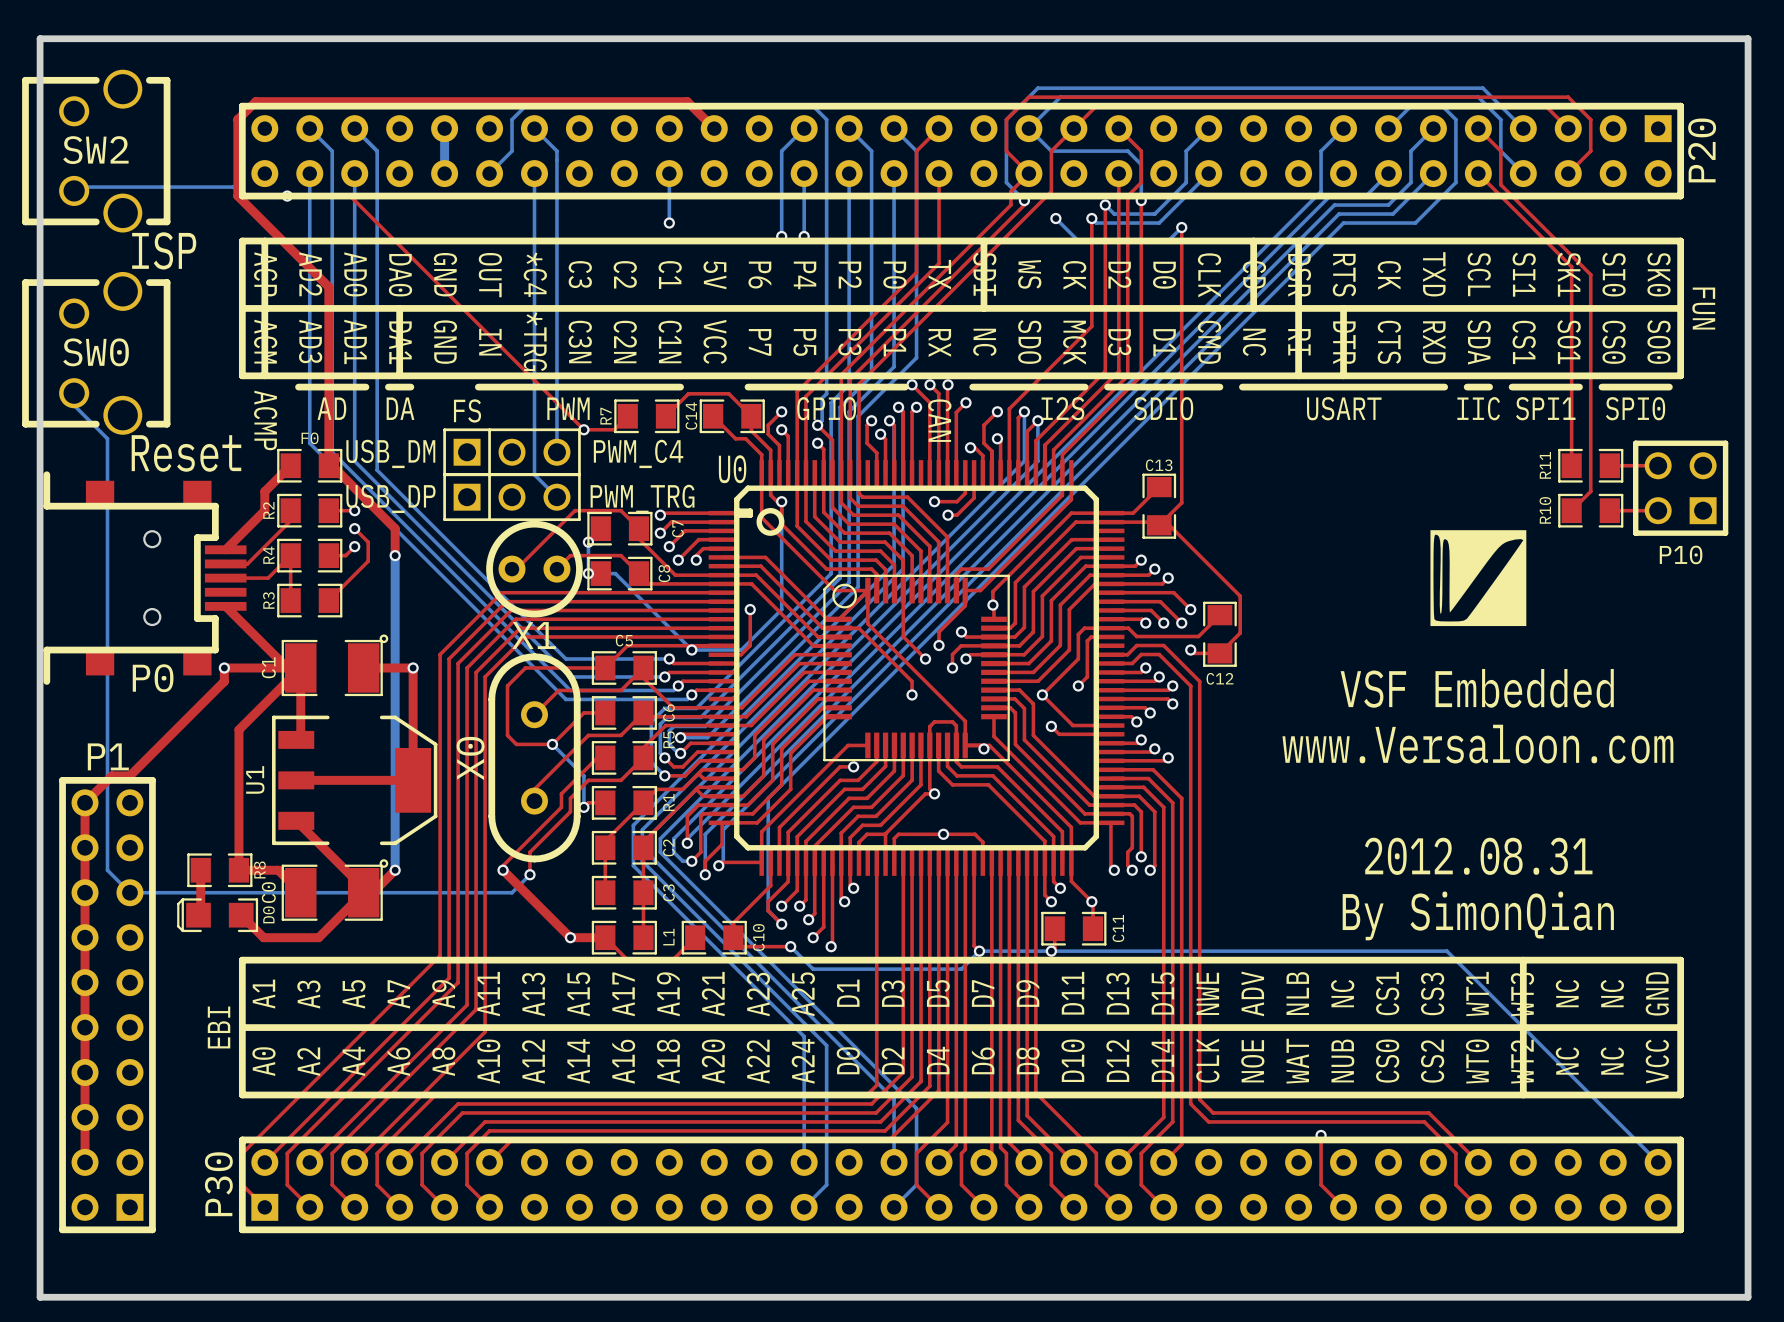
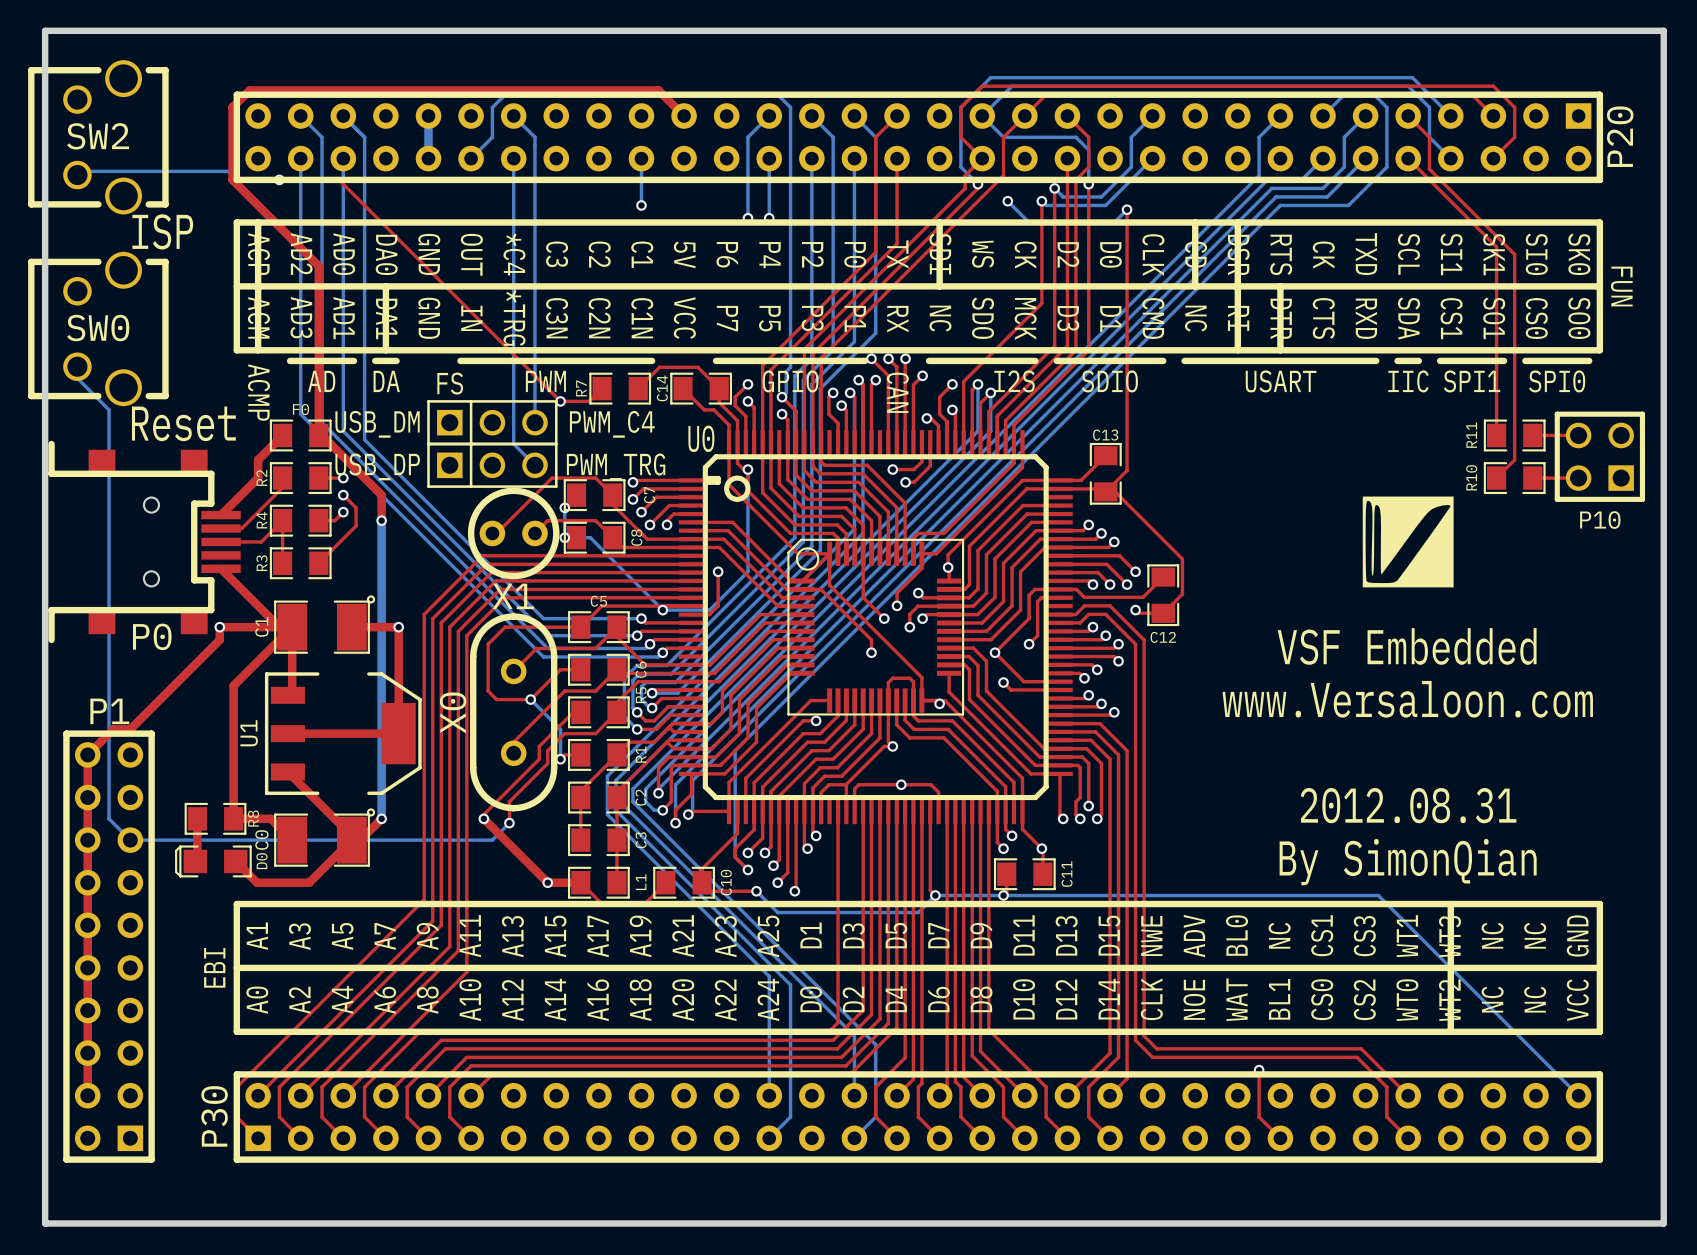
text: NLB (1297, 993) -> BL0 (1237, 935)
text: NUB (1342, 1060) -> BL1 (1279, 999)

